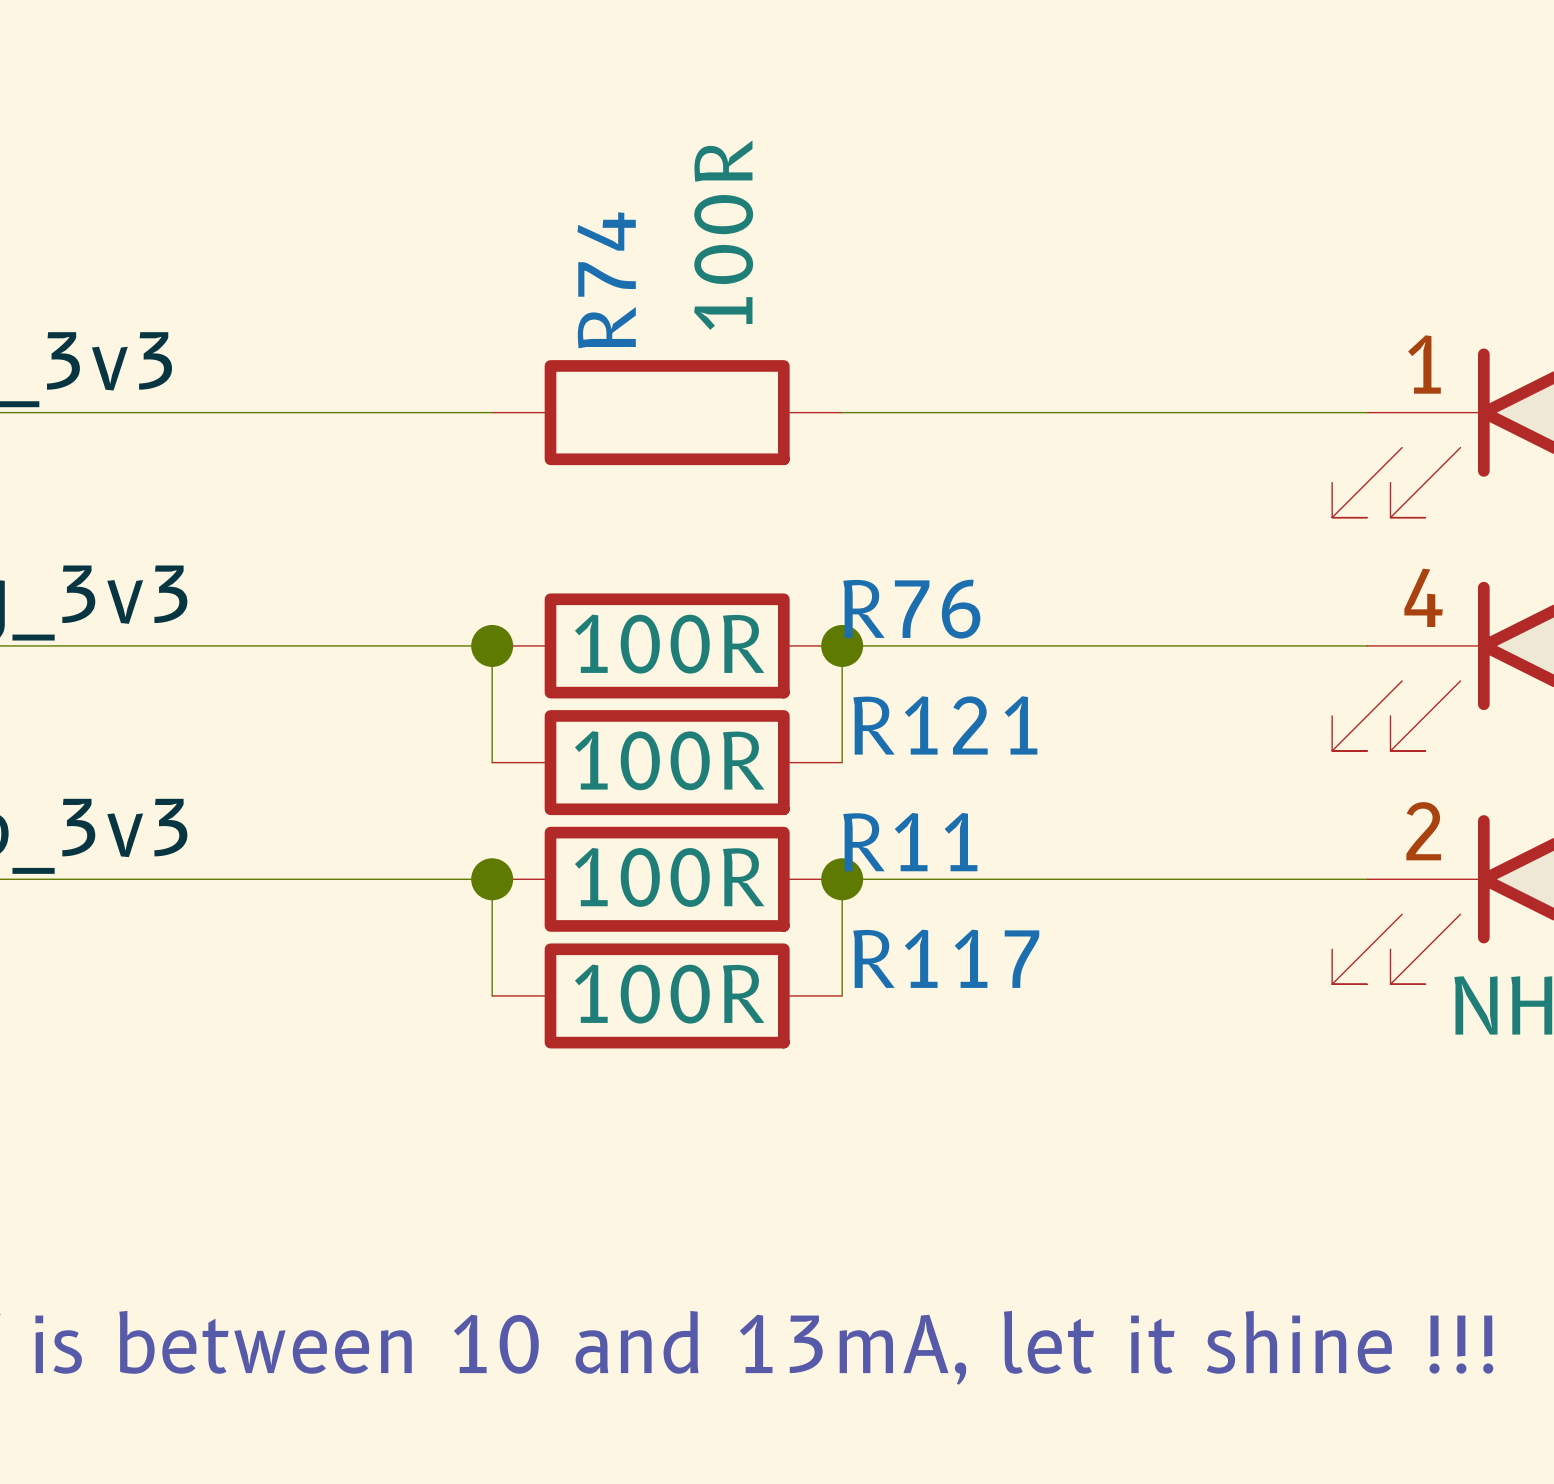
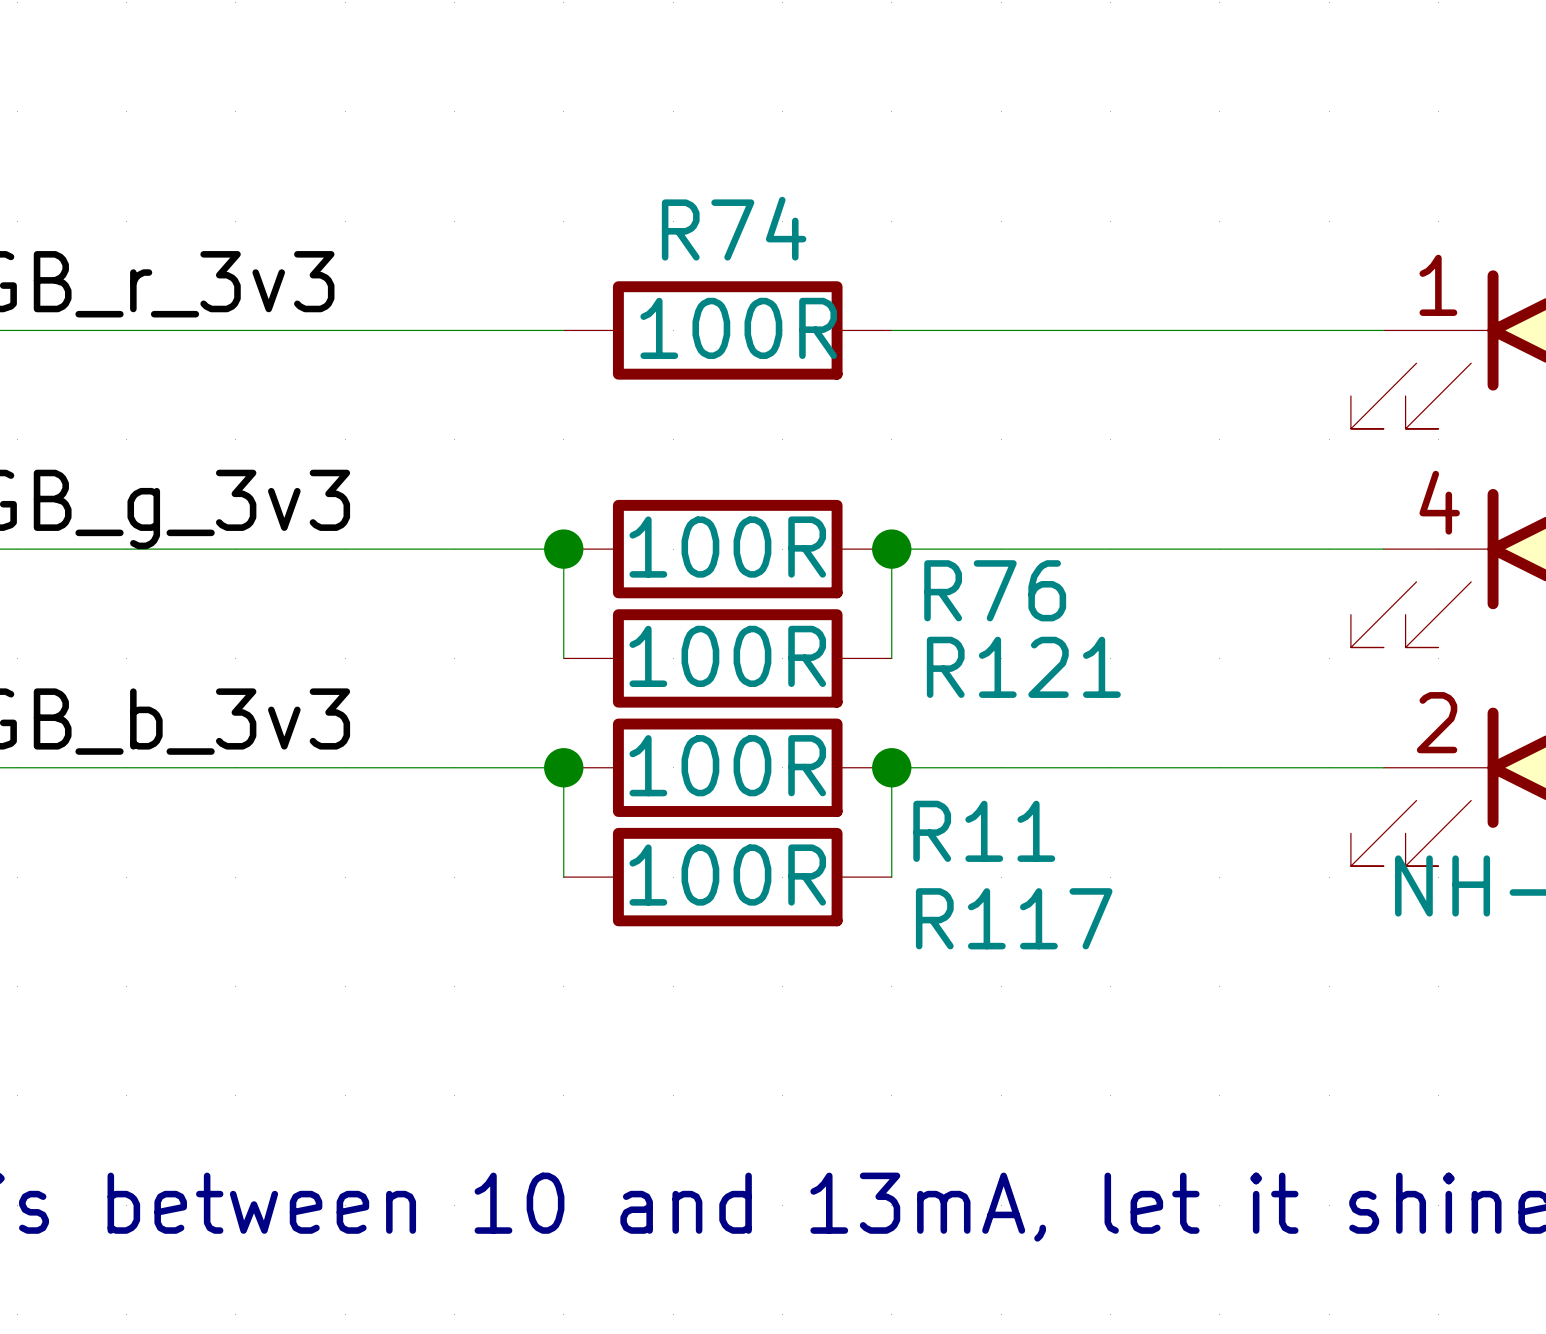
R74 value rotation: 0° (723, 235) -> 90° clockwise (738, 328)
R74 name rotation: 0° (606, 280) -> 90° clockwise (734, 228)
R76 name position: R76 (911, 609) -> R76 (995, 590)
R121 name position: R121 (945, 725) -> R121 (1023, 667)
R11 name position: R11 (910, 842) -> R11 (984, 831)
R117 name position: R117 (946, 958) -> R117 (1014, 918)

